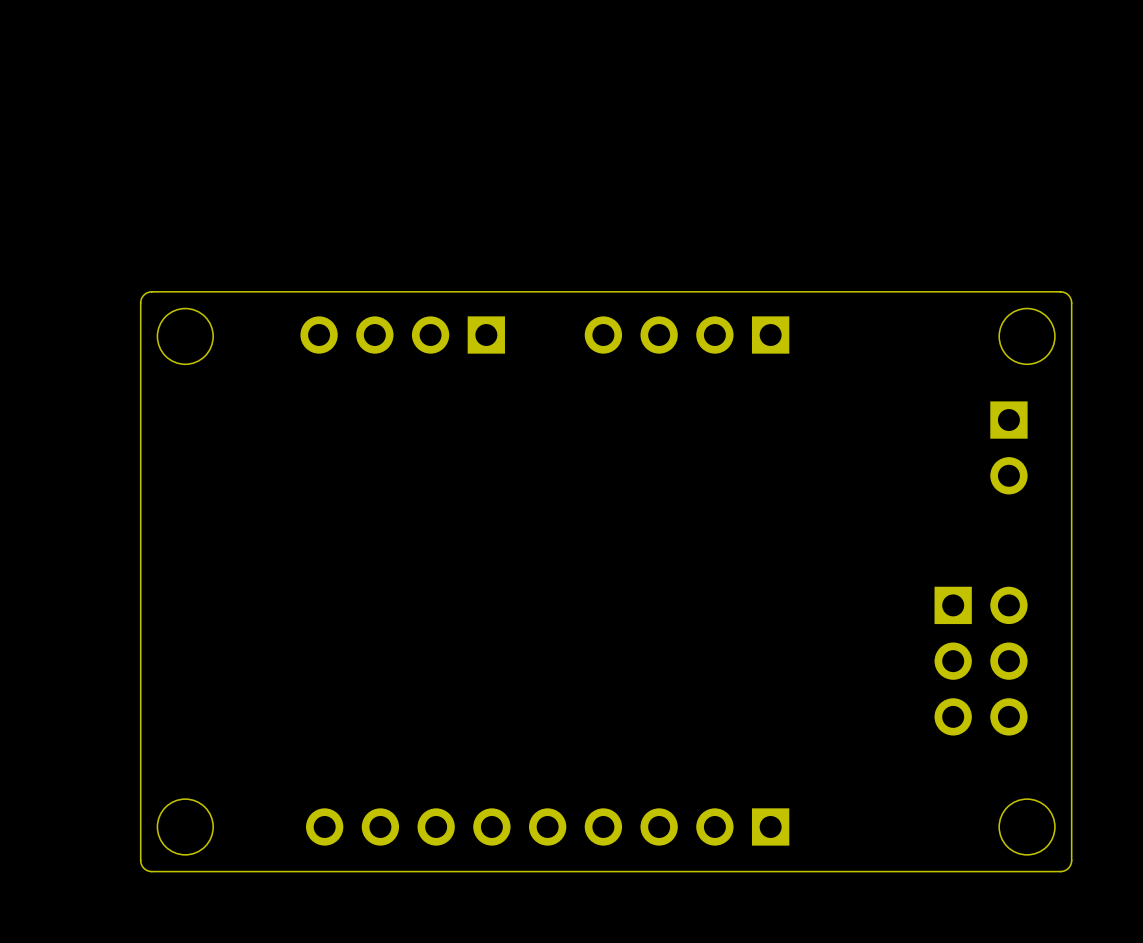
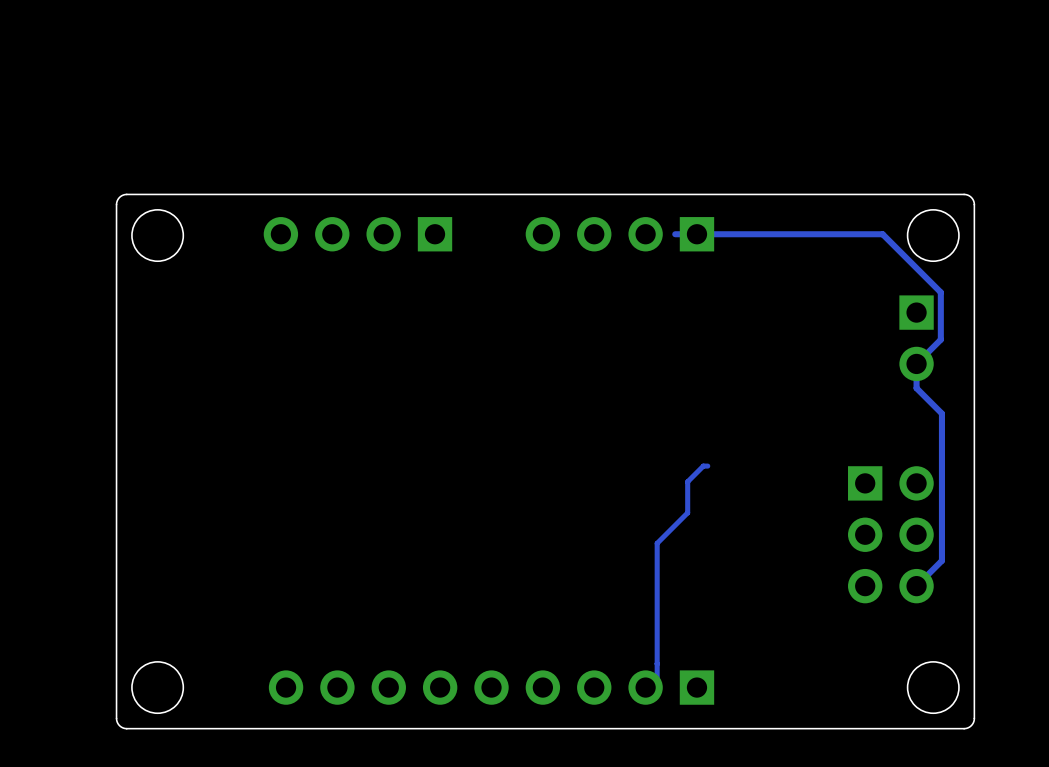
track: none -> (675, 234) (882, 234) (940, 292) (940, 339) (916, 363) (916, 388) (941, 413) (941, 560) (916, 586)
track: none -> (707, 466) (703, 466) (687, 481) (687, 512) (657, 543) (657, 687)

